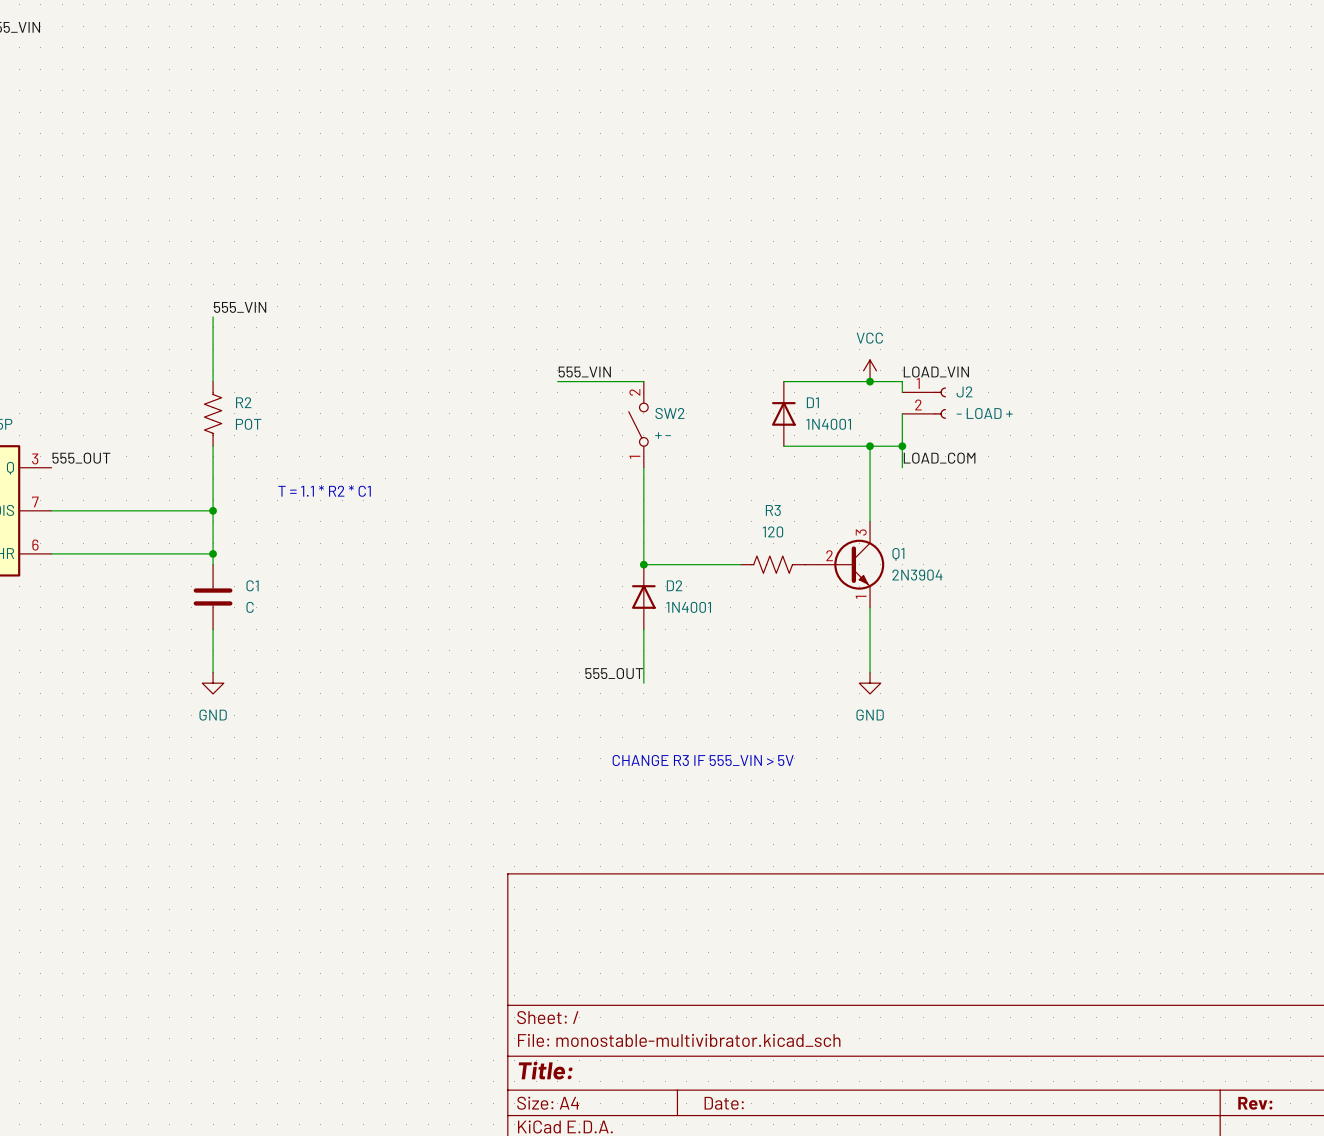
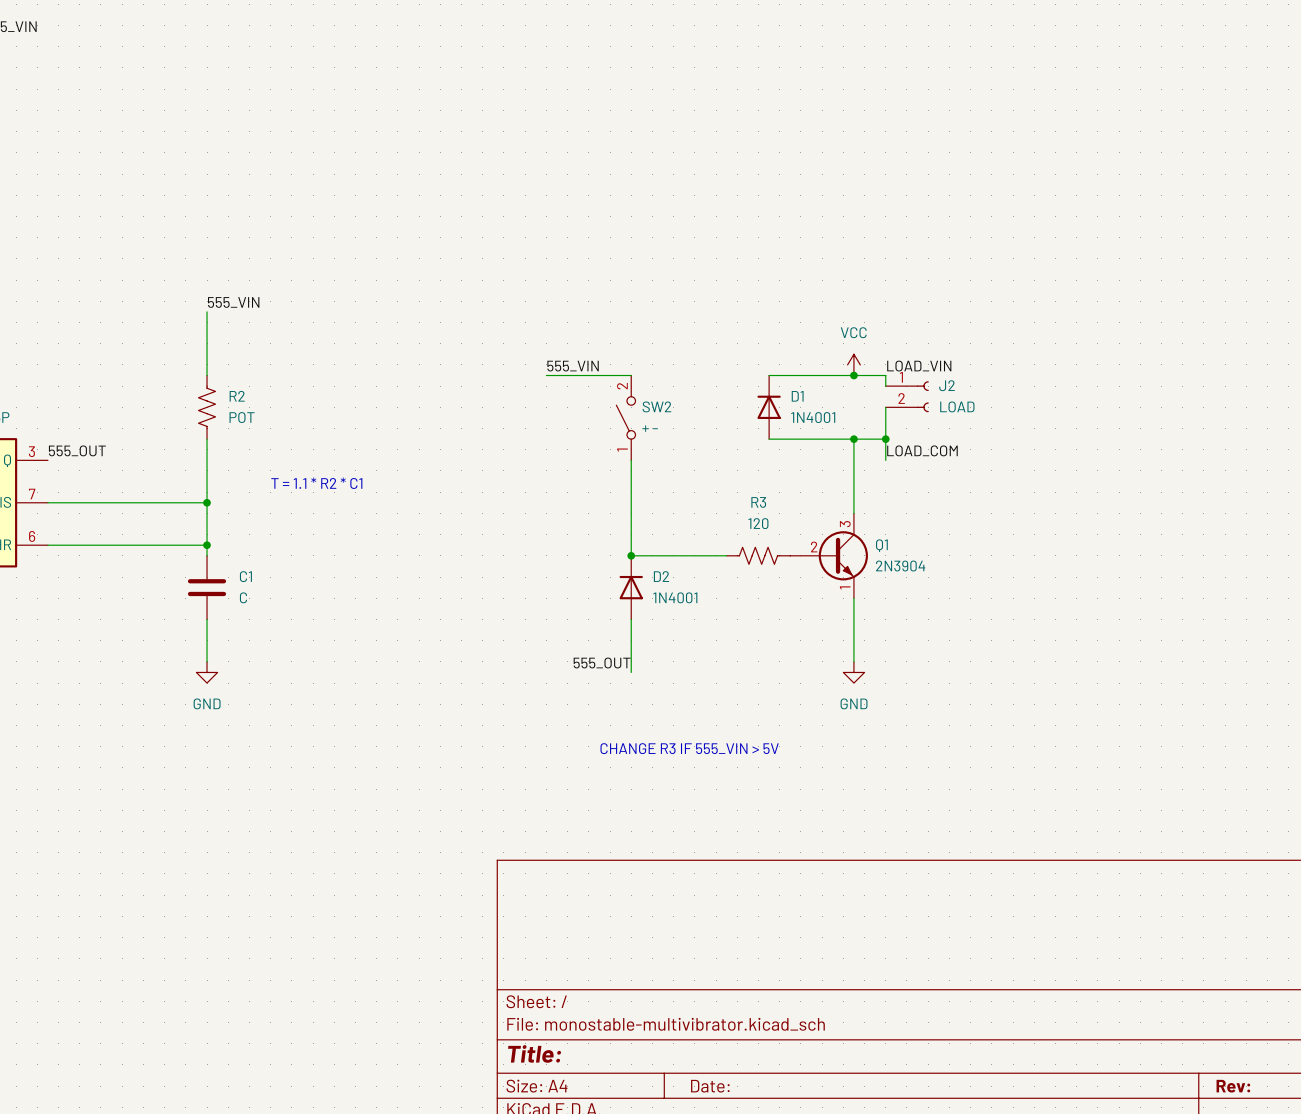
J2 value: - LOAD + (984, 413) -> LOAD (957, 406)

